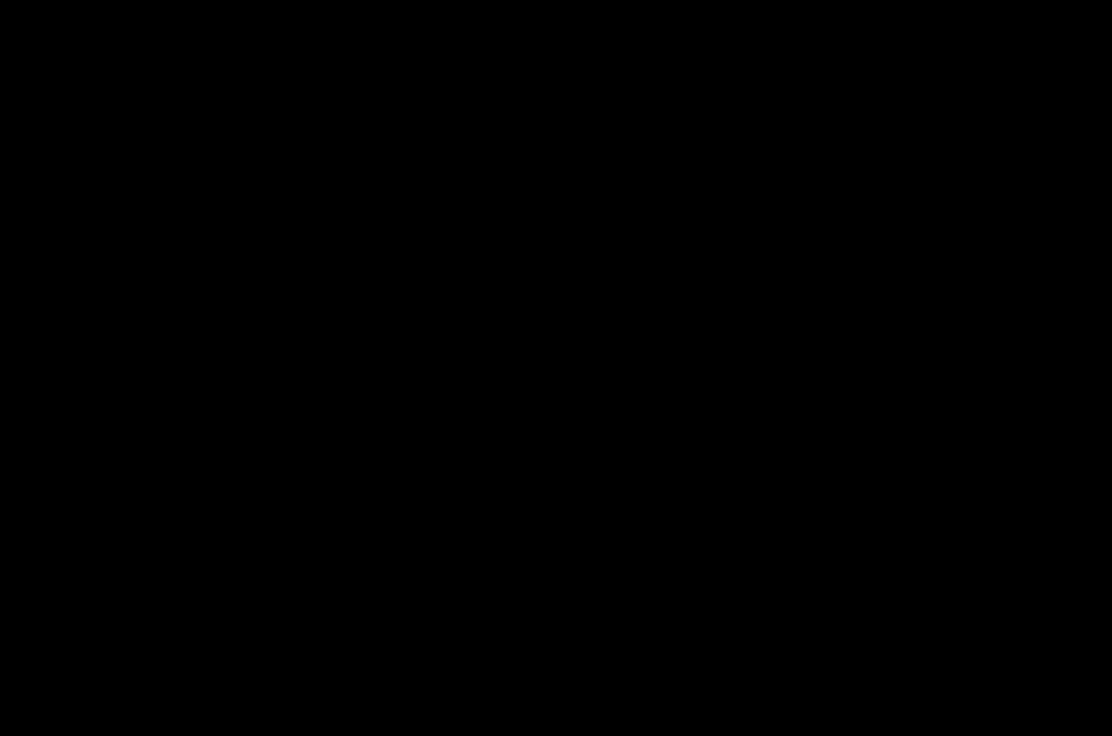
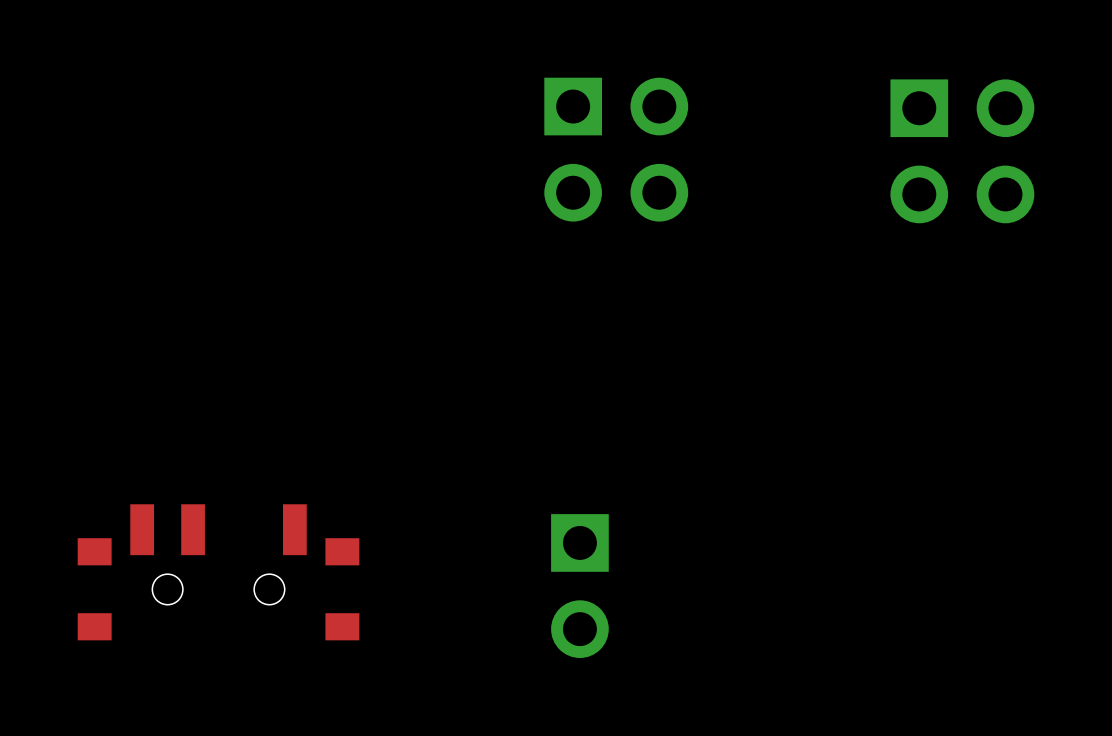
part: none -> (616, 149)
part: none -> (962, 151)
part: none -> (218, 572)
part: none -> (579, 586)

